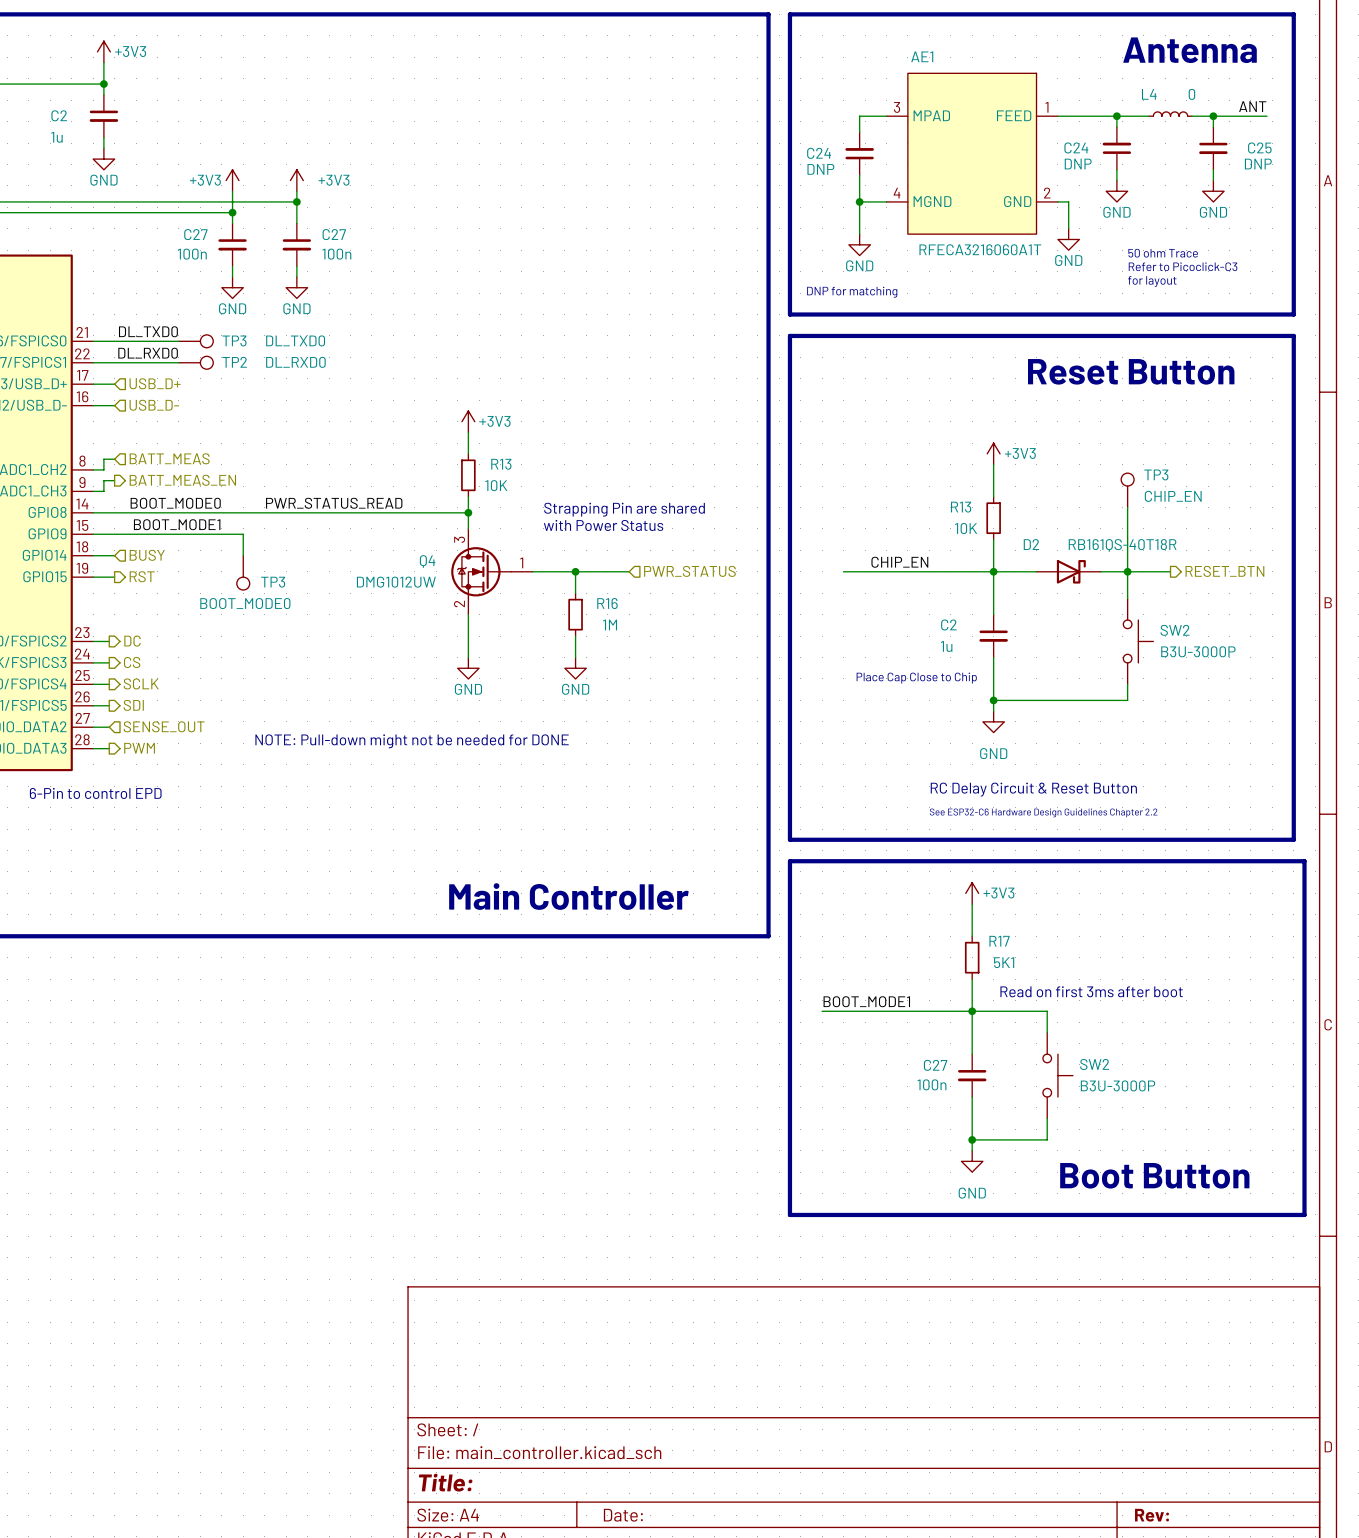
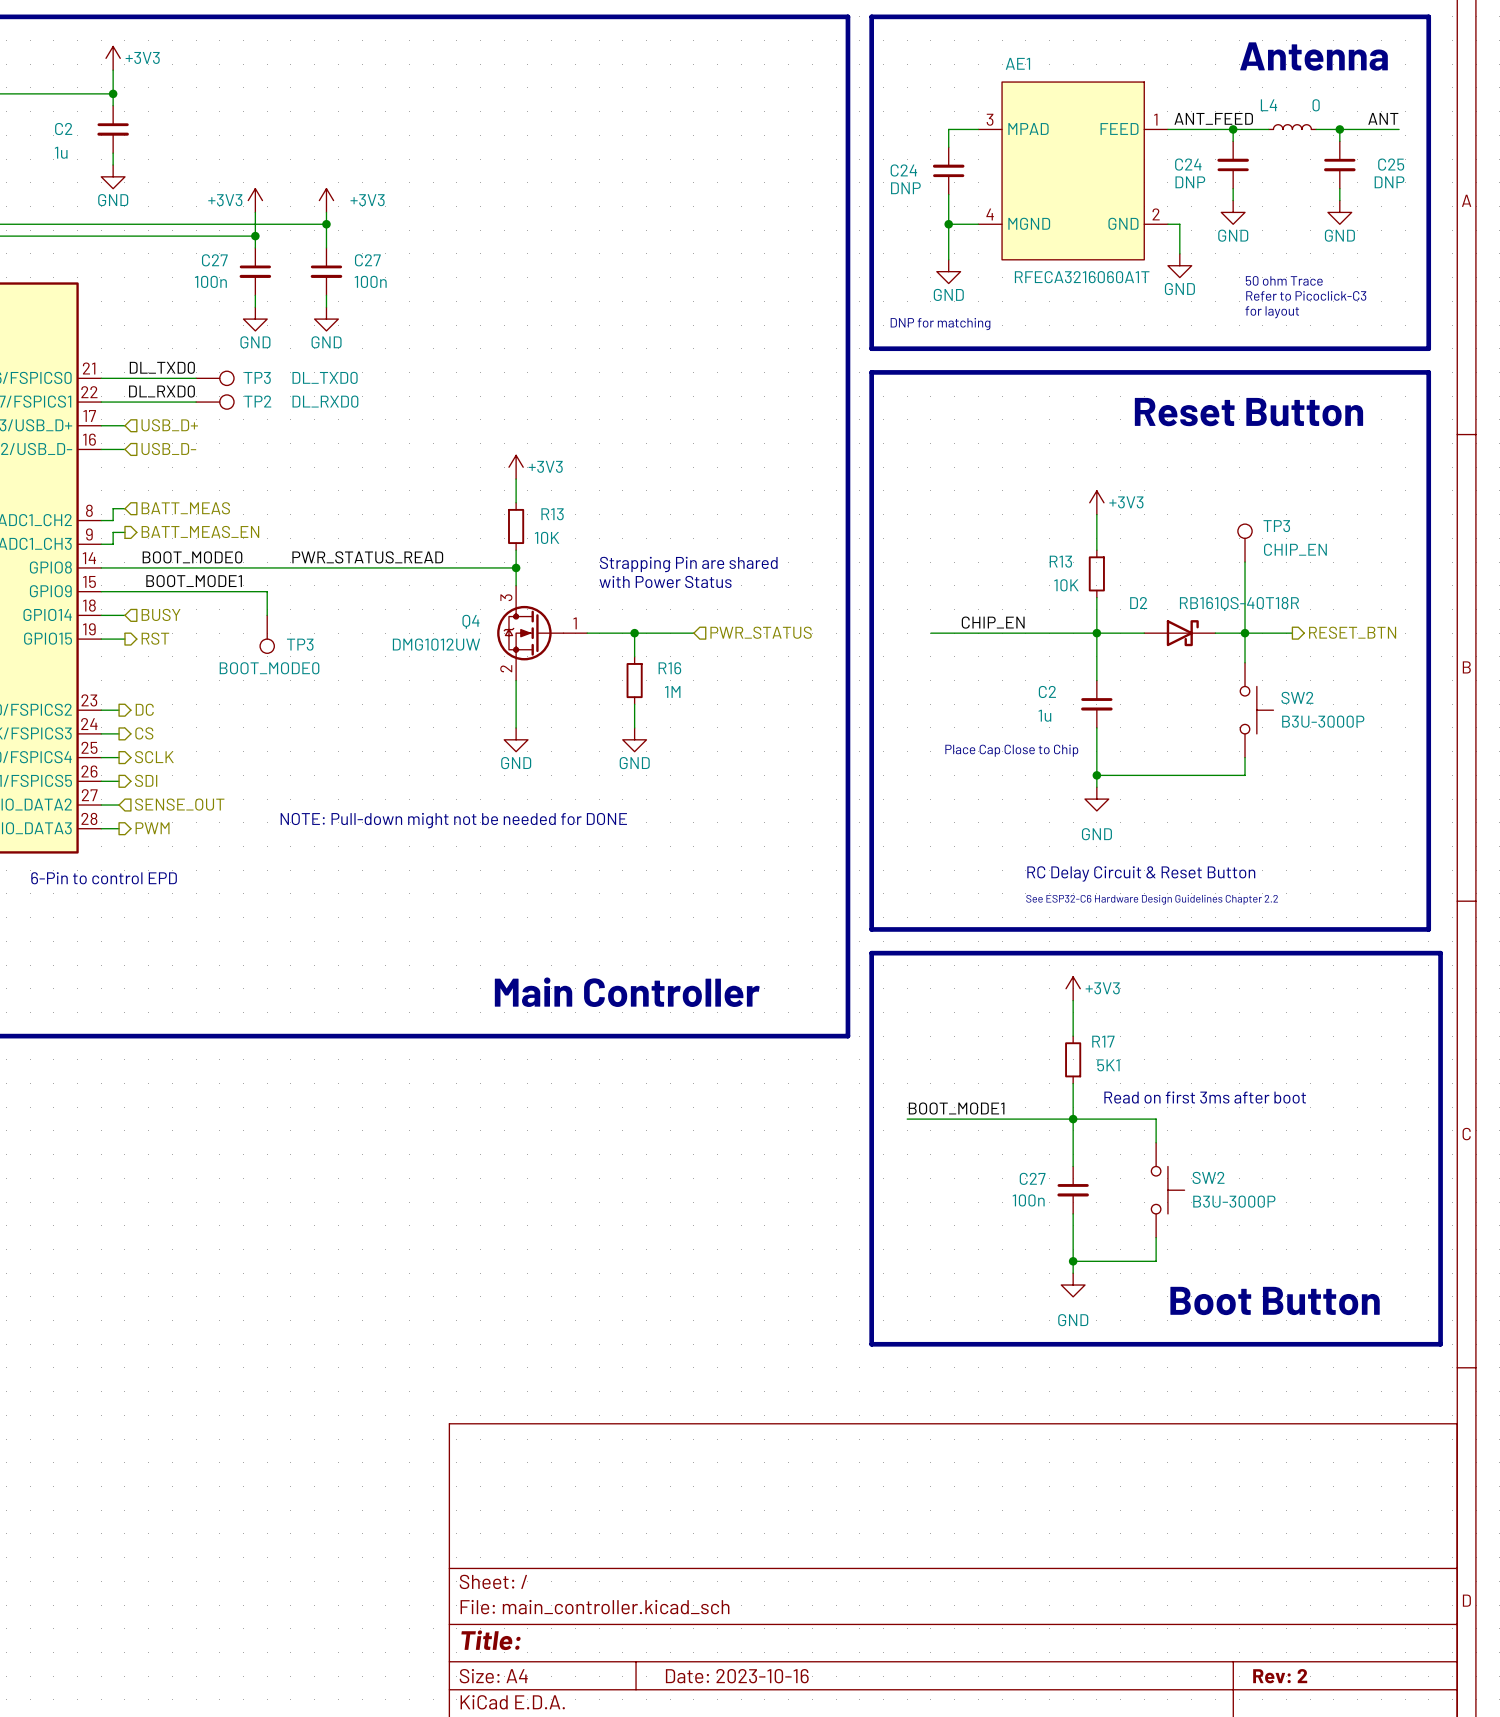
label: none -> ANT_FEED (1213, 118)
title block: Date: (623, 1515) -> Date: 2023-10-16 (737, 1676)
title block: Rev: (1151, 1515) -> Rev: 2 (1280, 1676)

